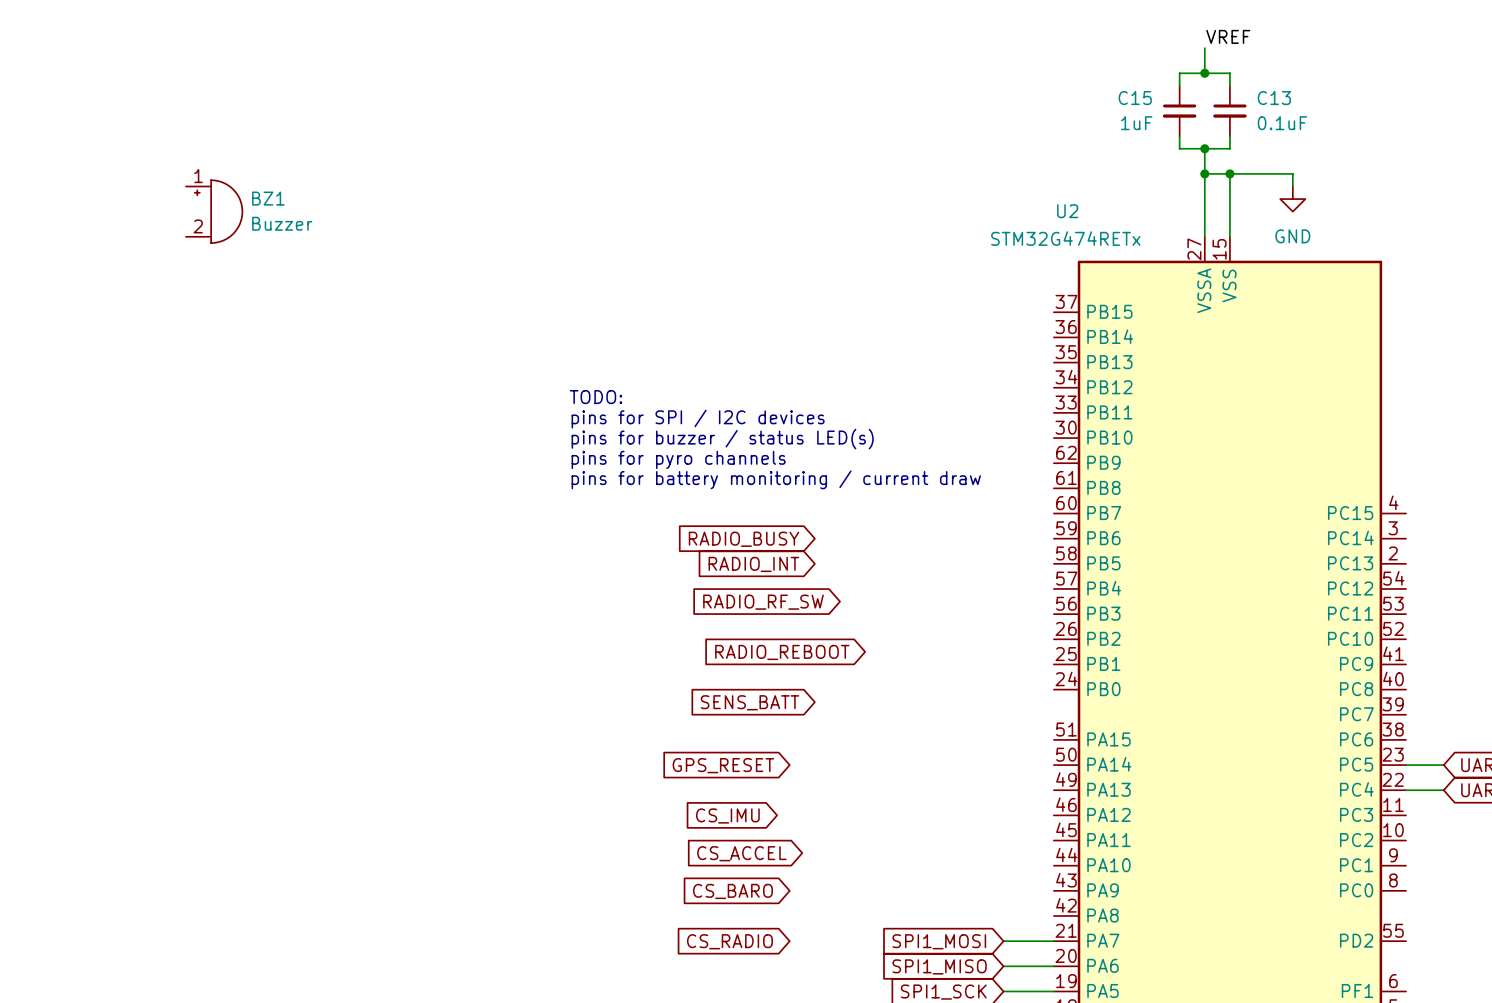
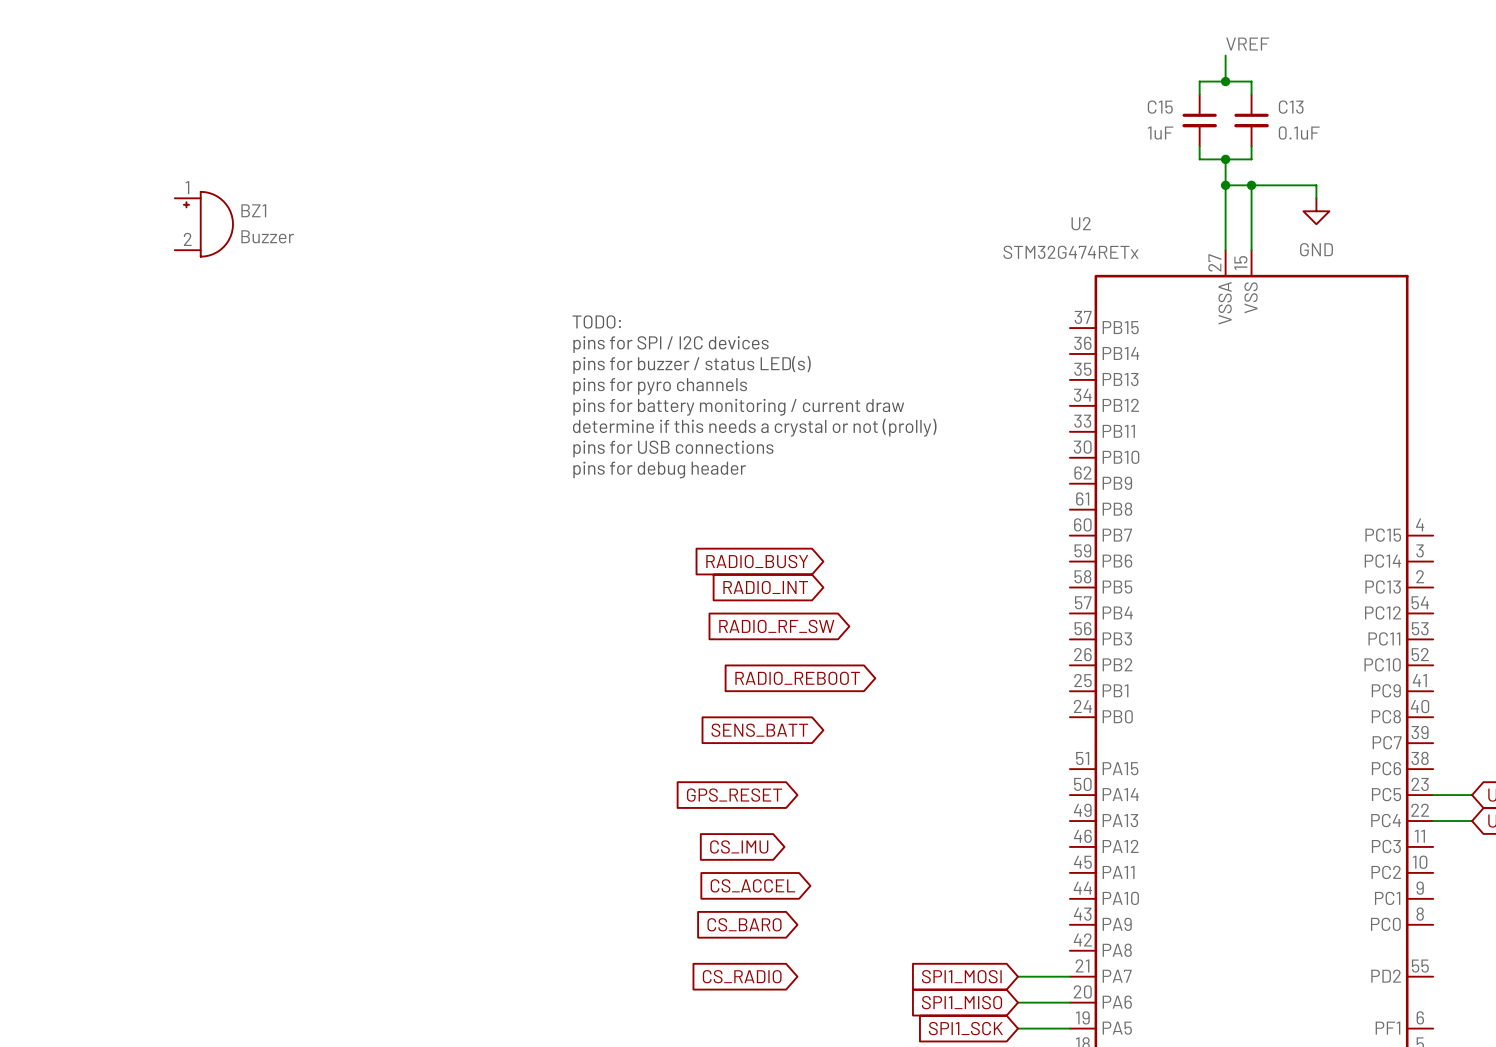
text position: TODO: (595, 397) -> TODO: (596, 321)
text: none -> determine if this needs a crystal or not (prolly) (754, 427)
text position: pins for SPI / I2C devices (698, 419) -> pins for SPI / I2C devices (671, 344)
text: none -> pins for USB connections (673, 448)
text position: pins for buzzer / status LED(s) (722, 439) -> pins for buzzer / status LED(s) (692, 364)
text: none -> pins for debug header (659, 469)
text position: pins for pyro channels (678, 459) -> pins for pyro channels (660, 386)
text position: pins for battery monitoring / current draw (776, 479) -> pins for battery monitoring / current draw (738, 407)

